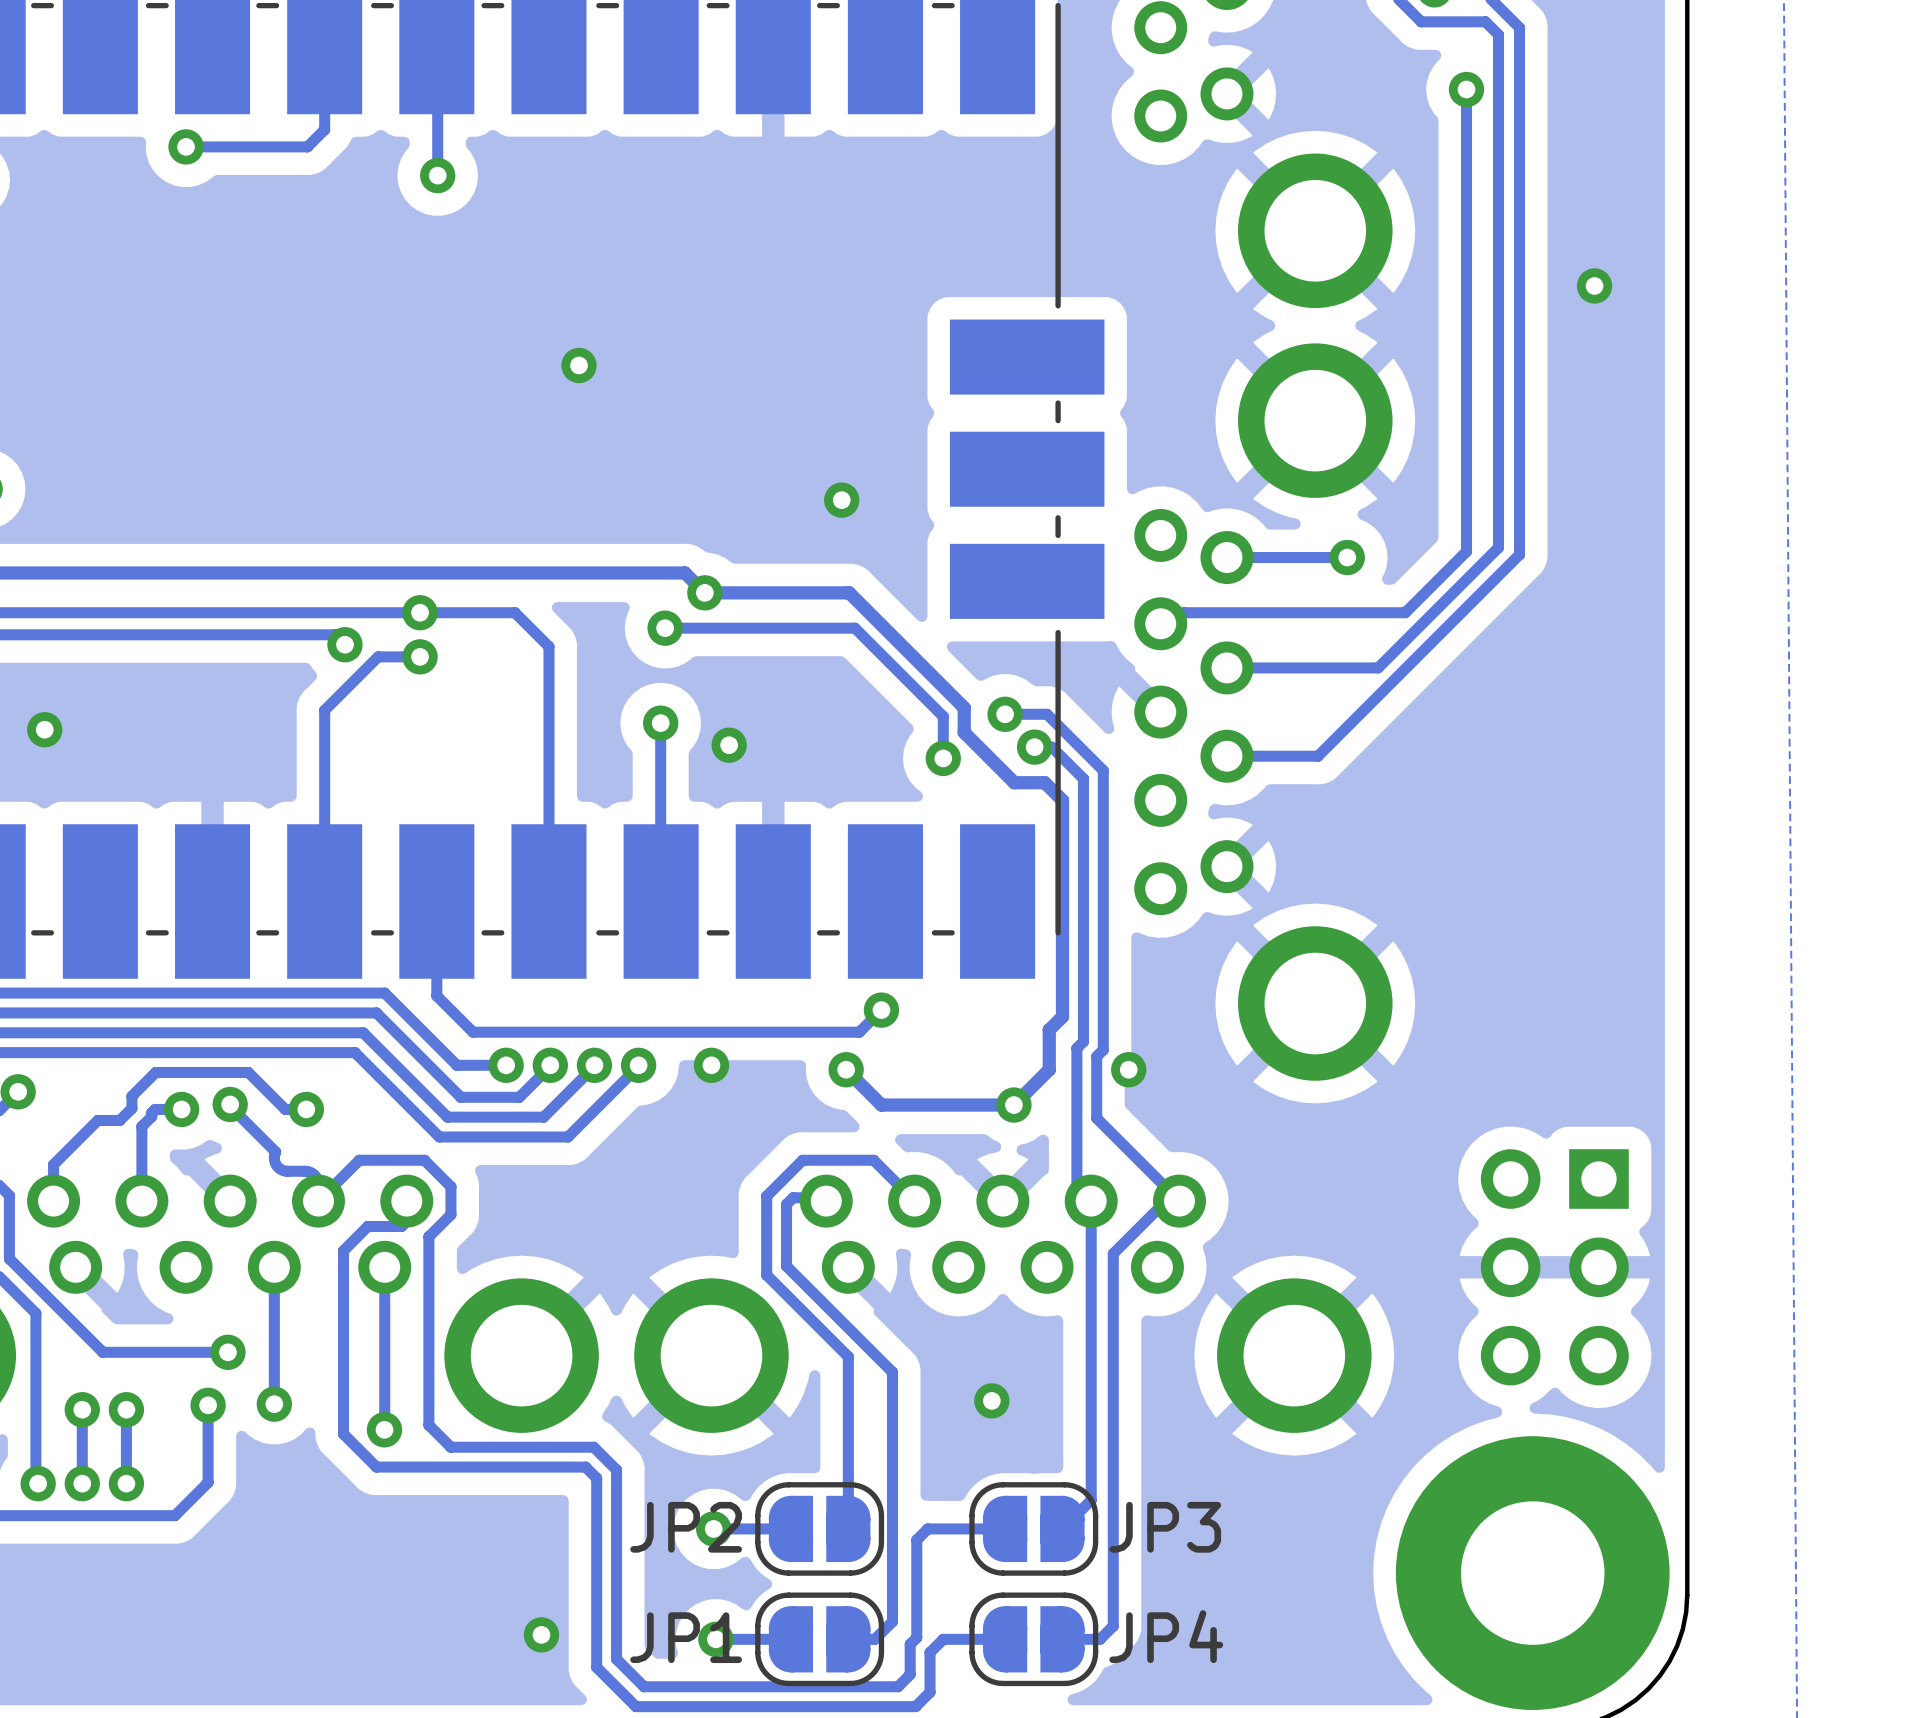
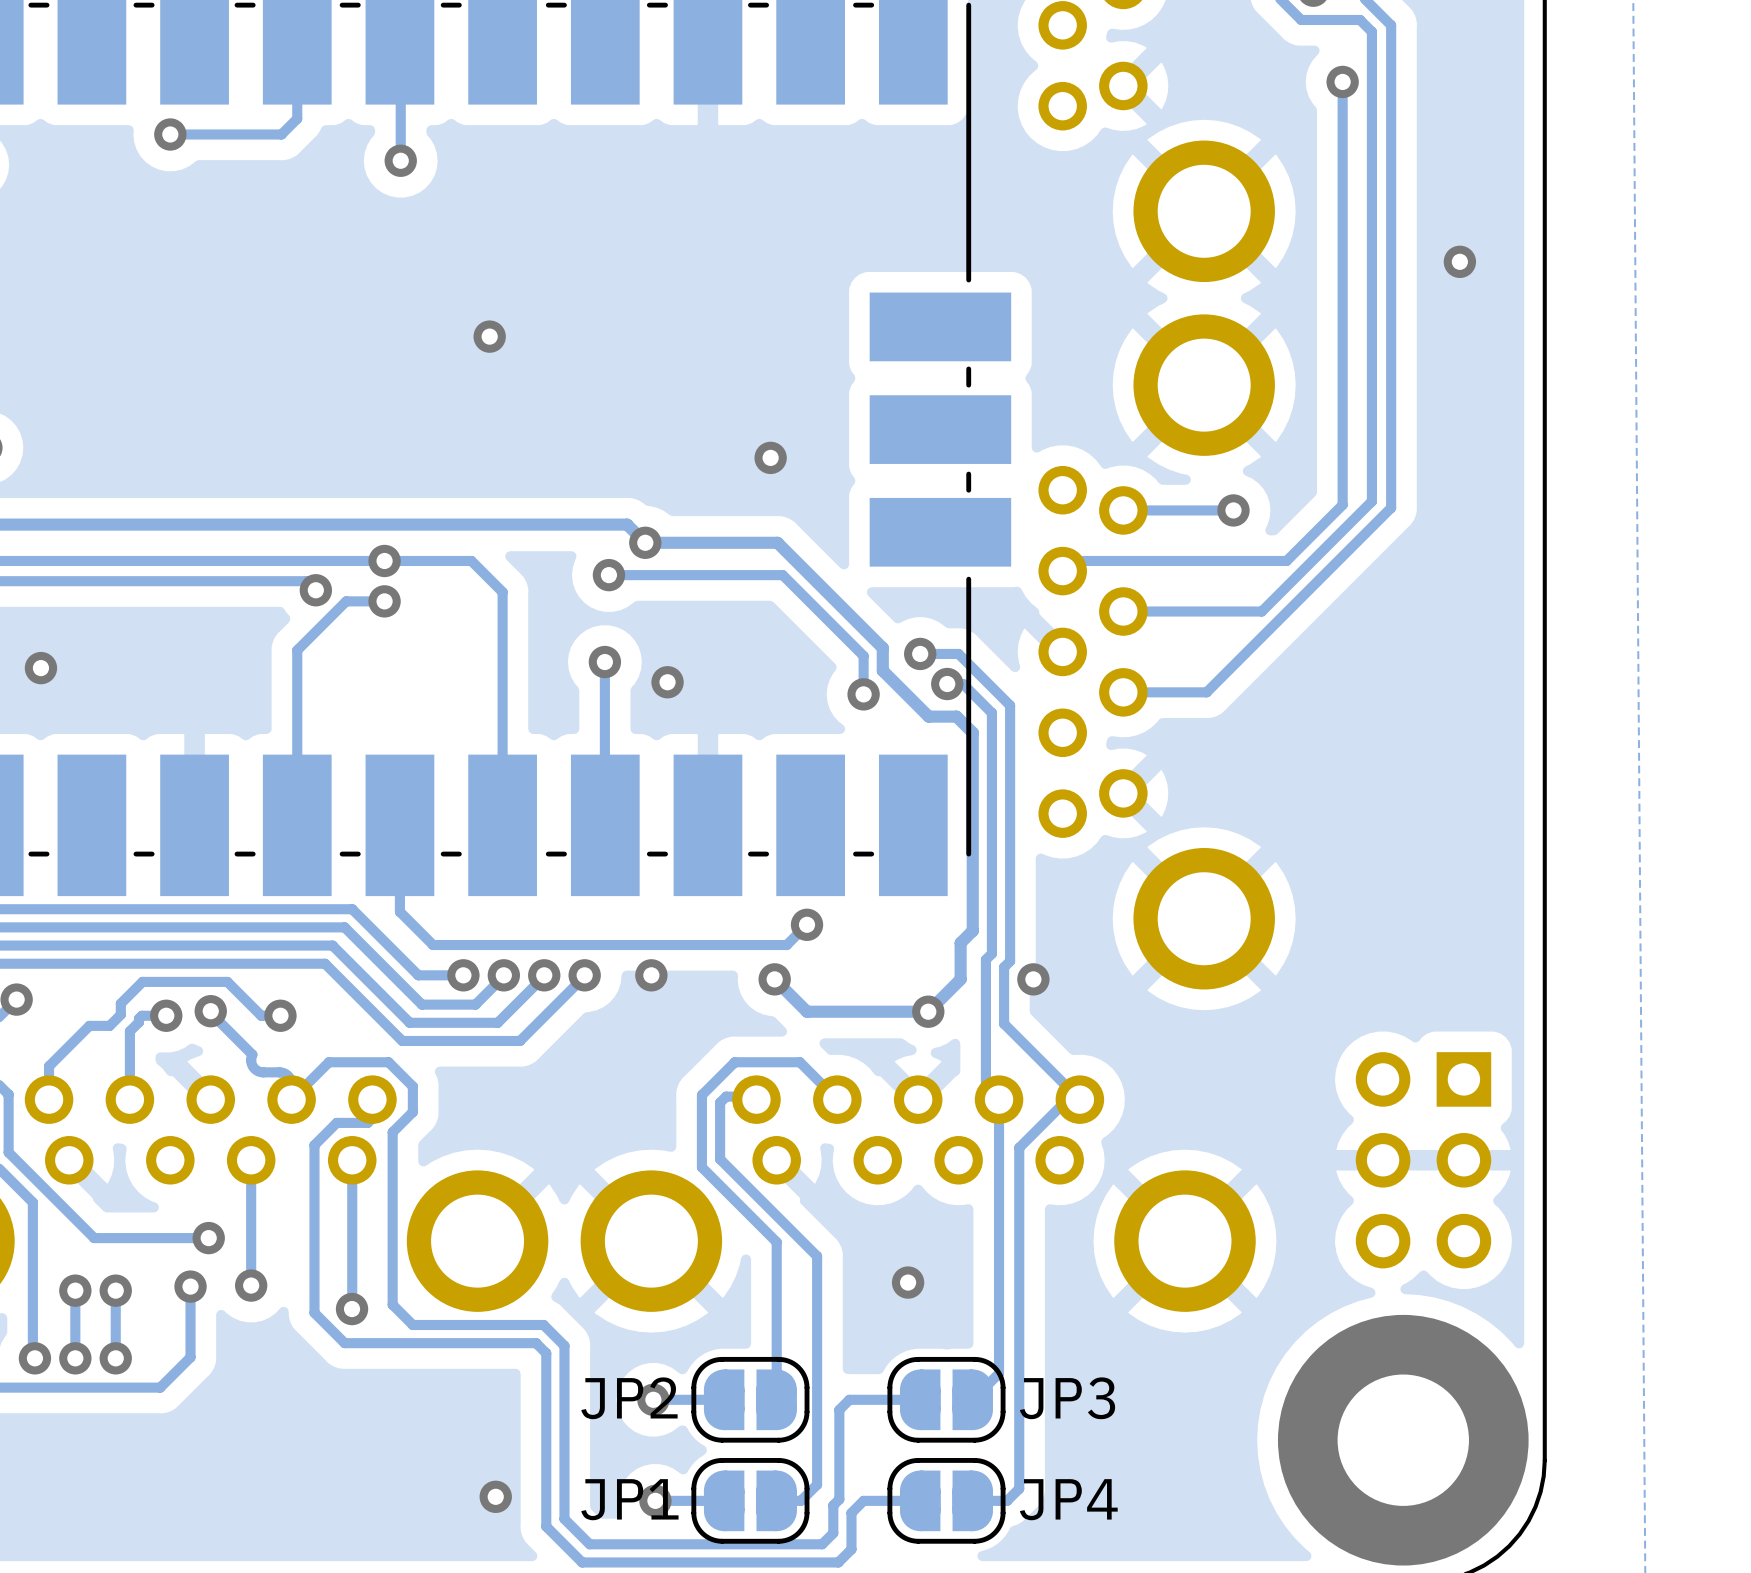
via position: (579, 365) -> (489, 336)

